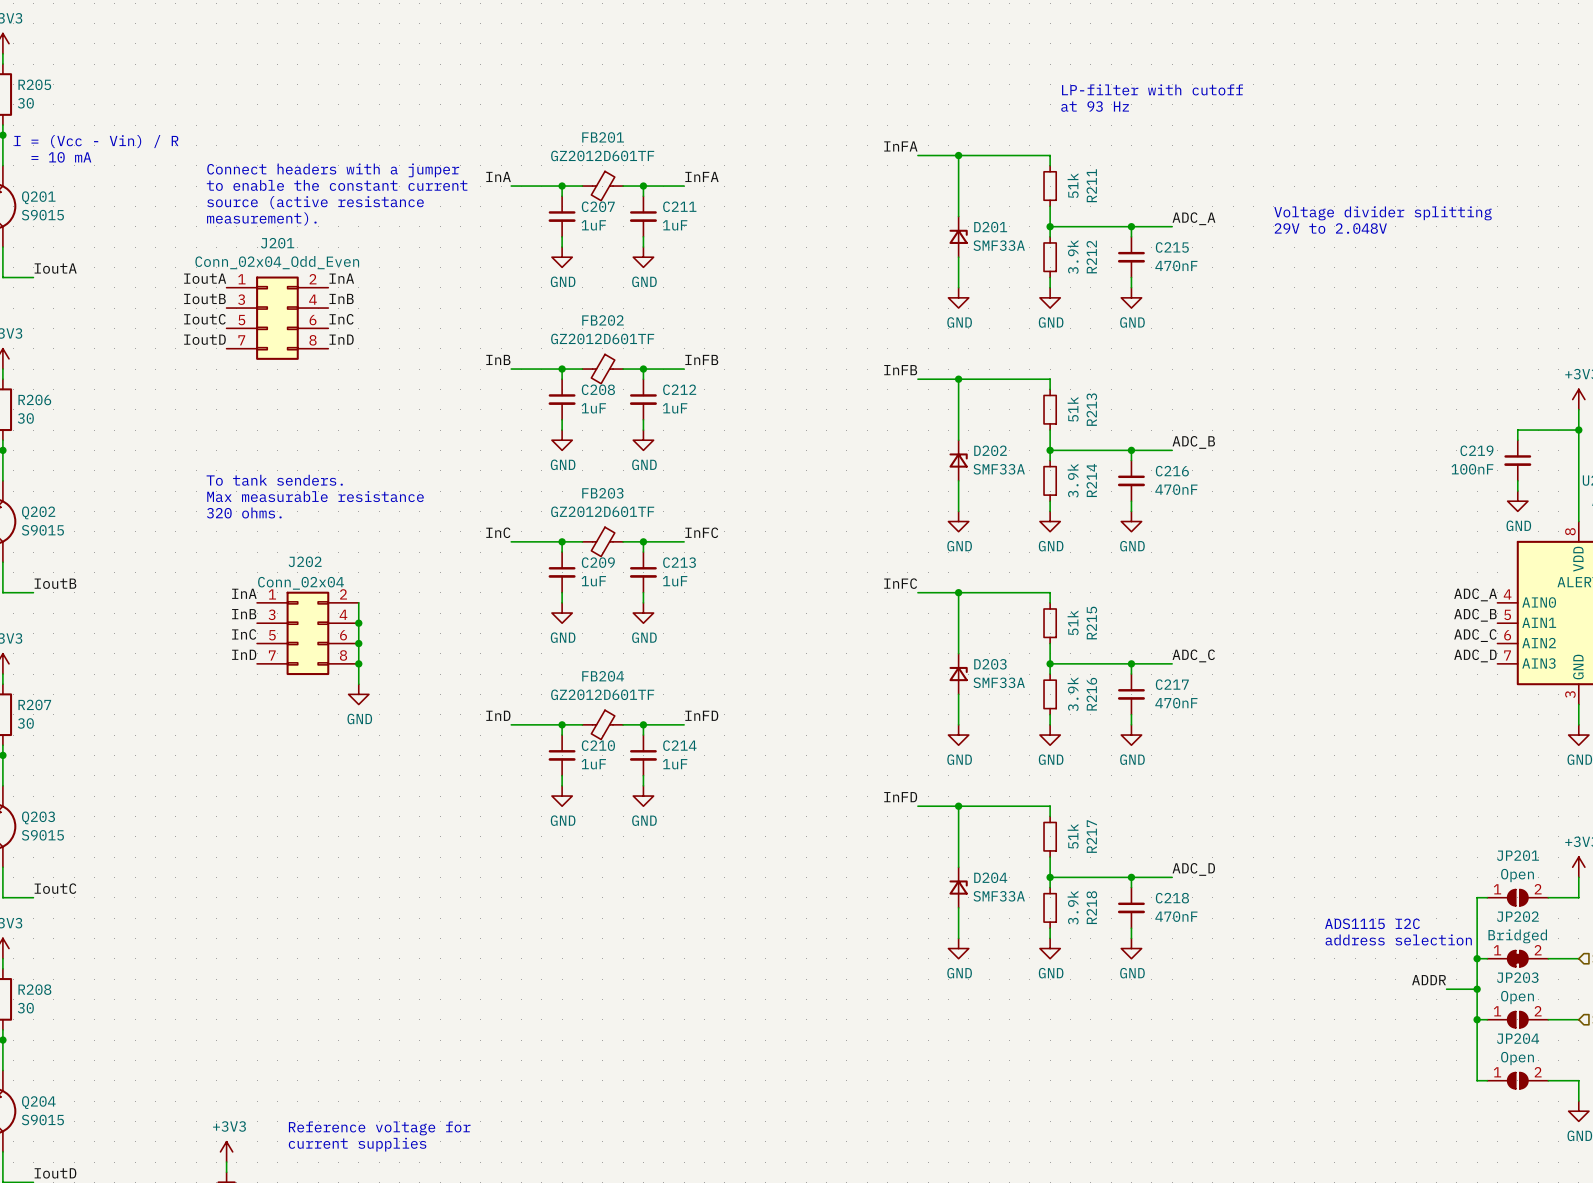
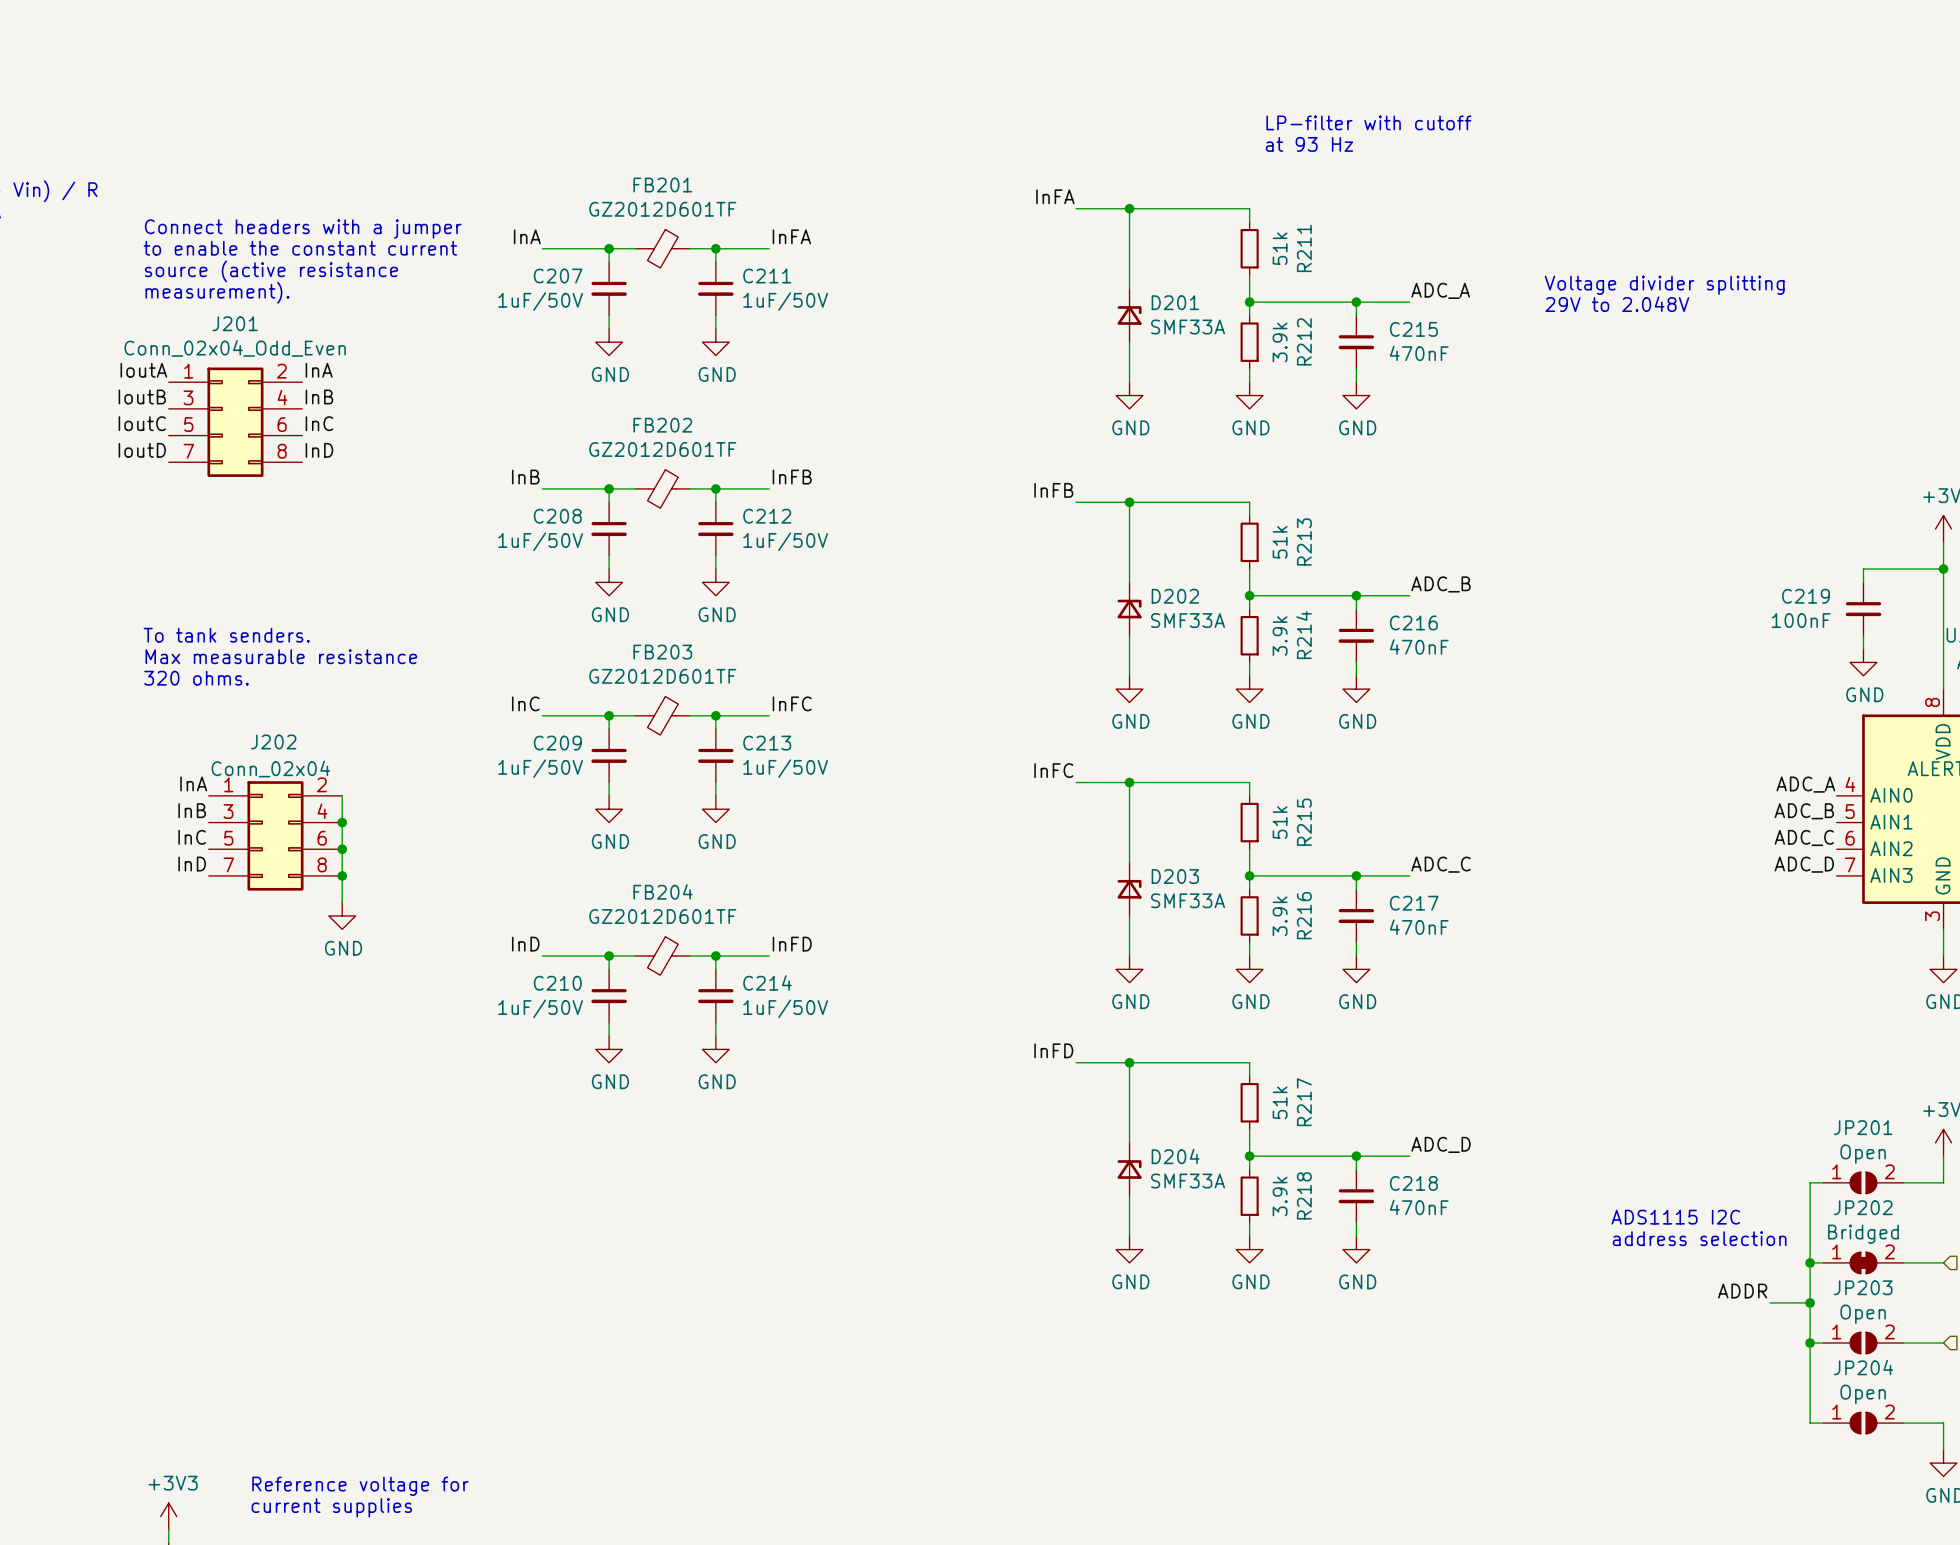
C207 name position: C207 (598, 206) -> C207 (558, 276)
C207 value: 1uF (593, 225) -> 1uF/50V (540, 301)
C211 value: 1uF (675, 225) -> 1uF/50V (785, 301)
C208 name position: C208 (598, 389) -> C208 (557, 516)
C208 value: 1uF (593, 408) -> 1uF/50V (540, 541)
C212 value: 1uF (675, 408) -> 1uF/50V (785, 541)
C209 name position: C209 (598, 562) -> C209 (557, 743)
C209 value: 1uF (593, 581) -> 1uF/50V (540, 768)
C213 value: 1uF (675, 581) -> 1uF/50V (785, 768)
C210 name position: C210 (598, 745) -> C210 (557, 983)
C210 value: 1uF (593, 764) -> 1uF/50V (540, 1008)
C214 value: 1uF (675, 764) -> 1uF/50V (785, 1008)

